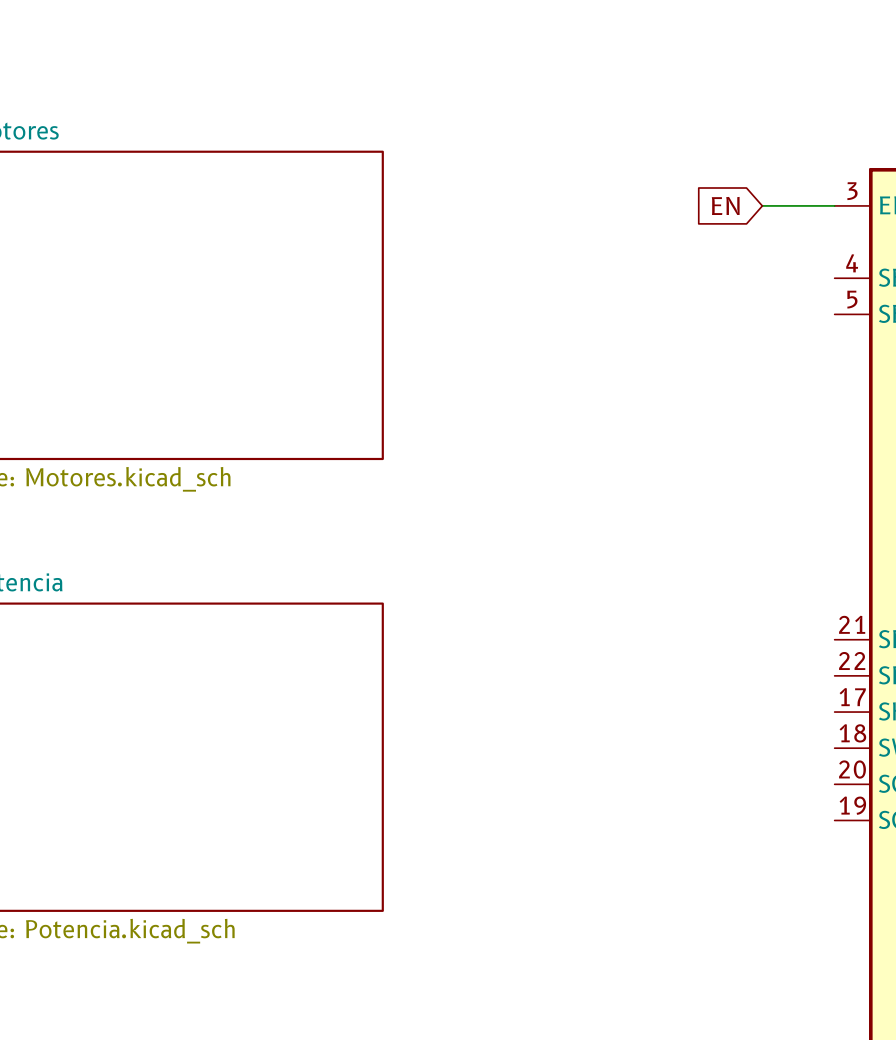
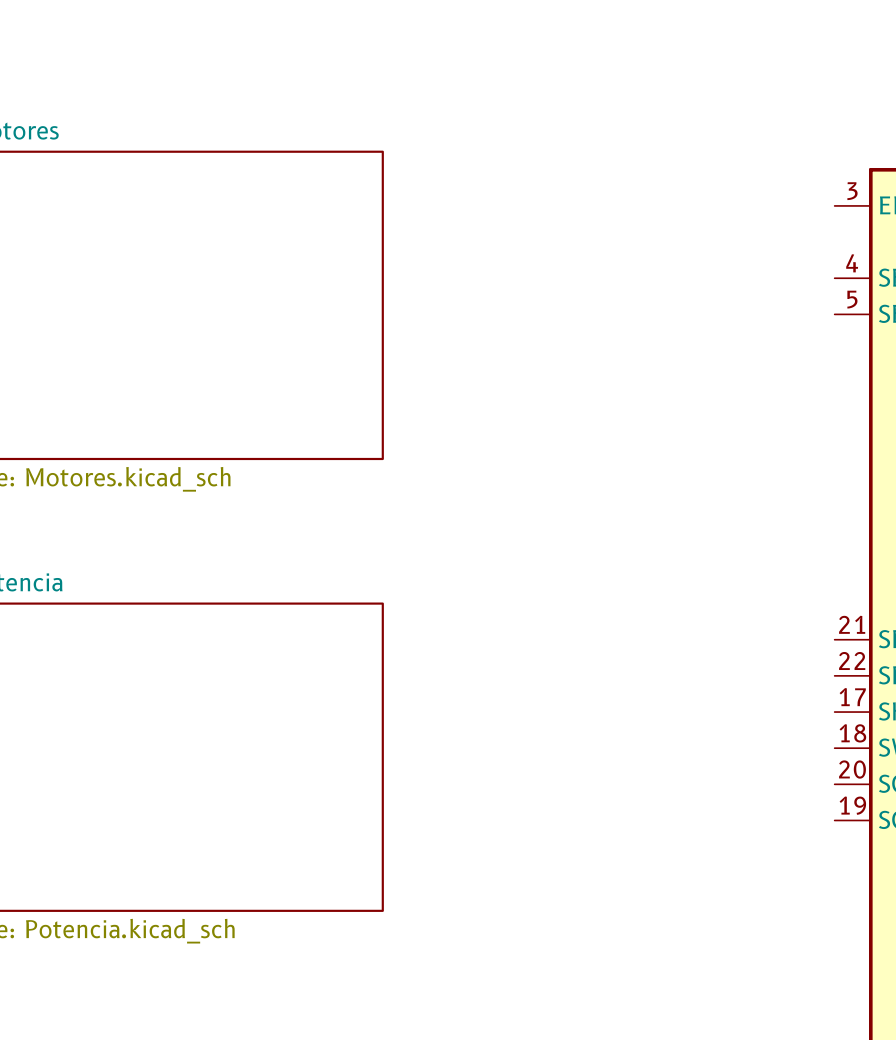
global label: EN (725, 205) -> none
wire: (762, 205) (834, 205) -> none

